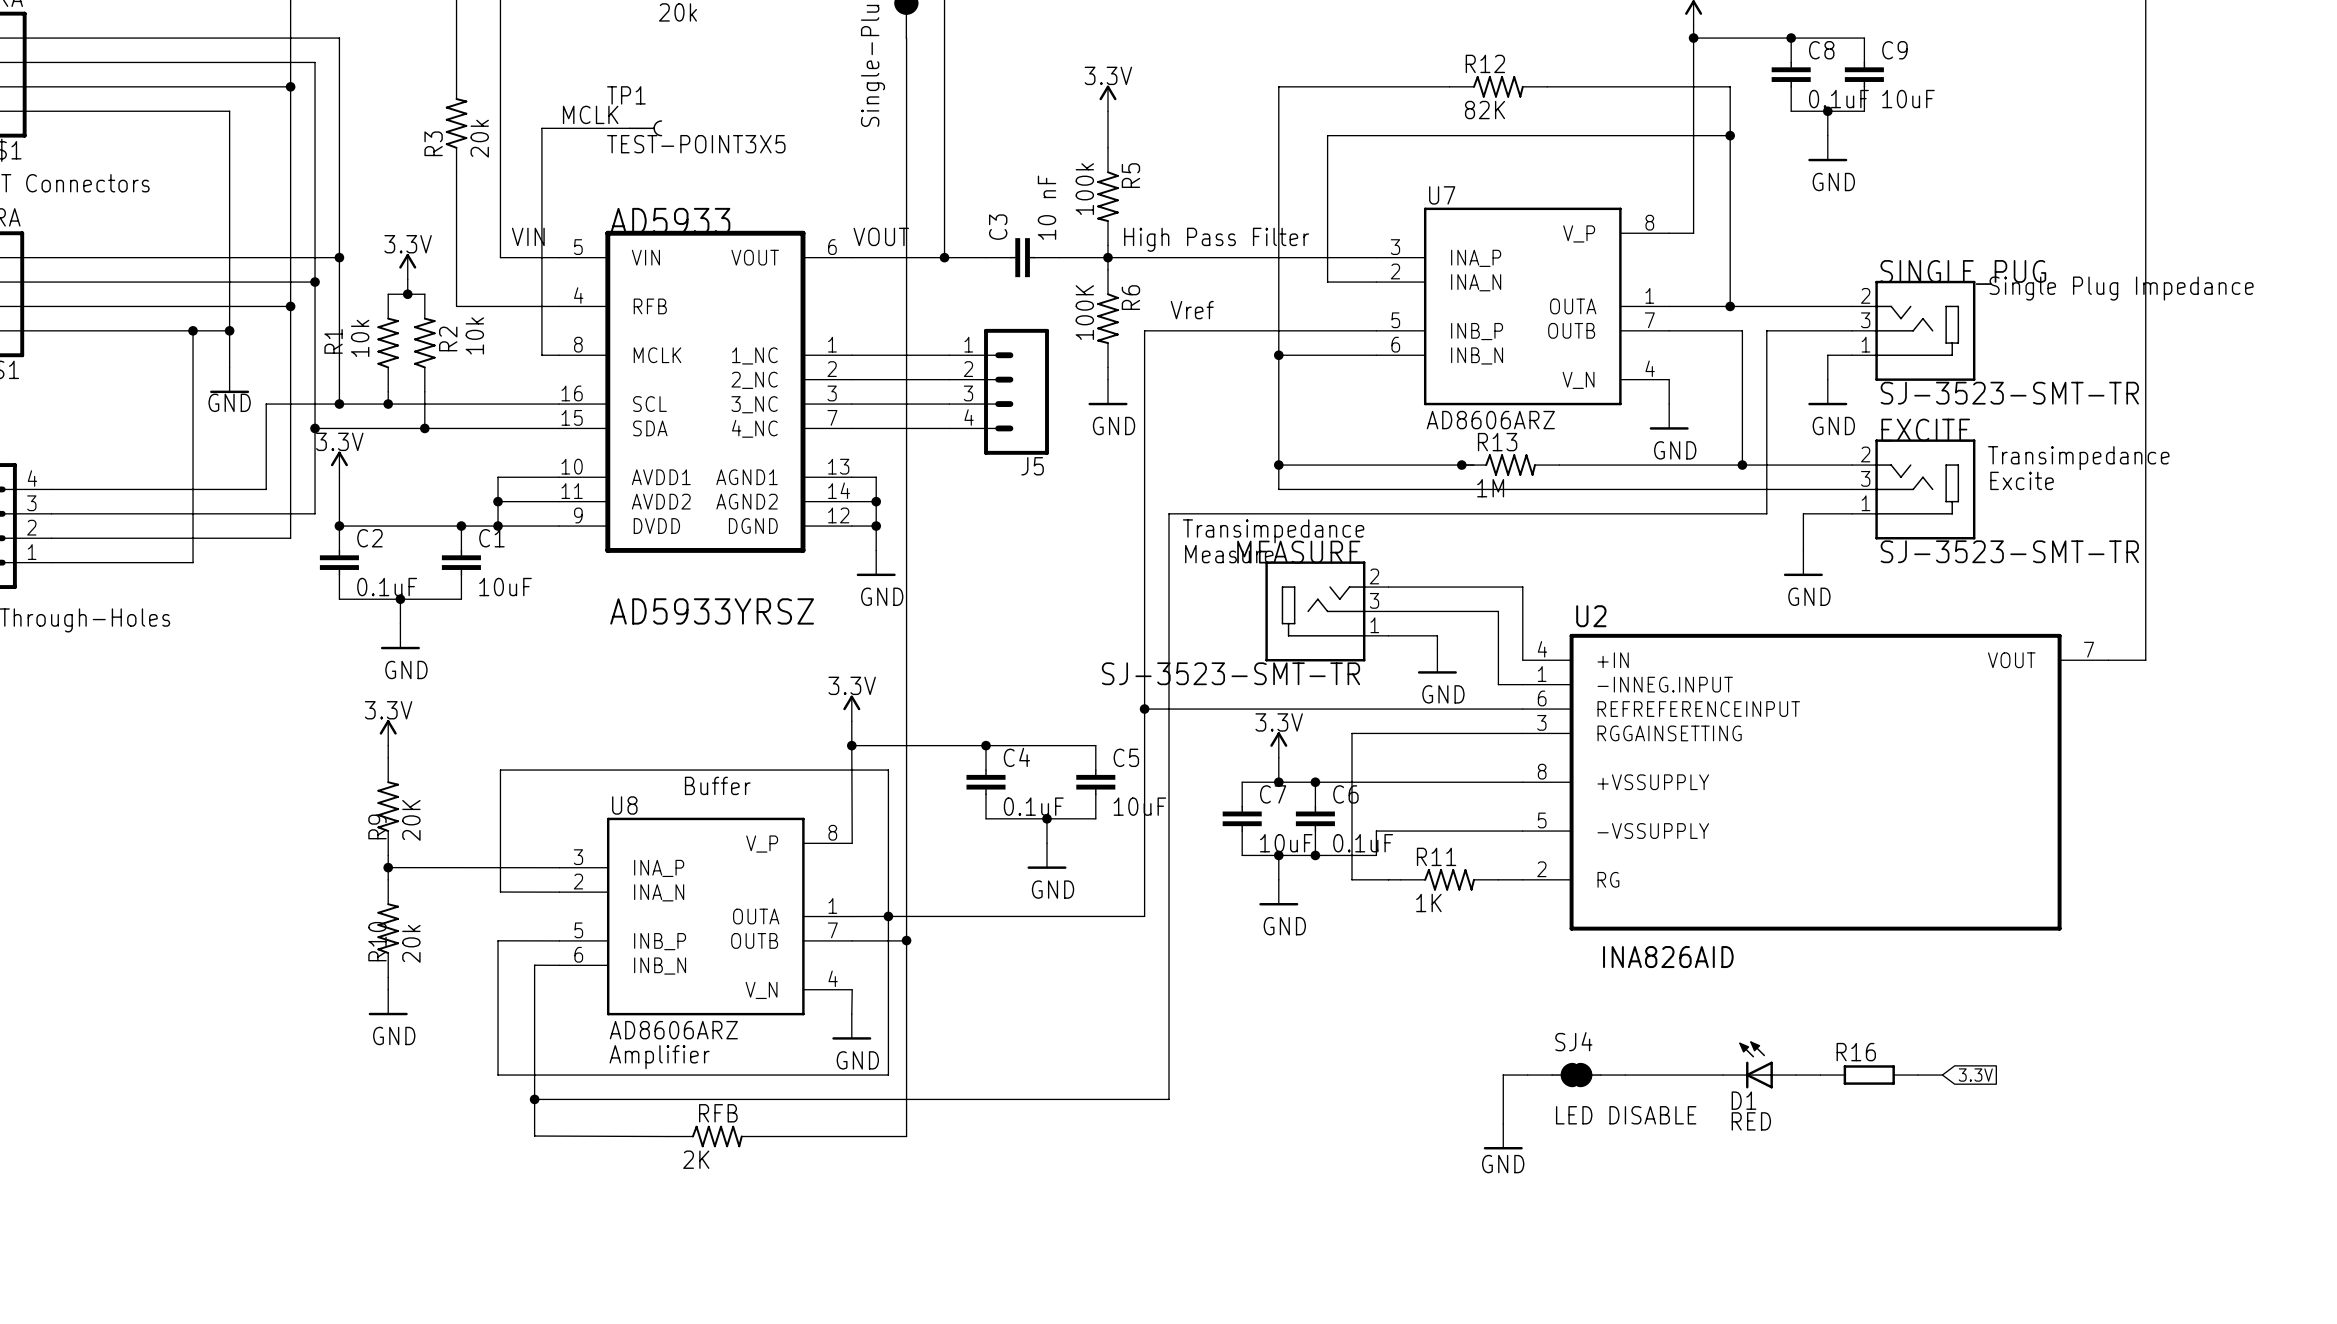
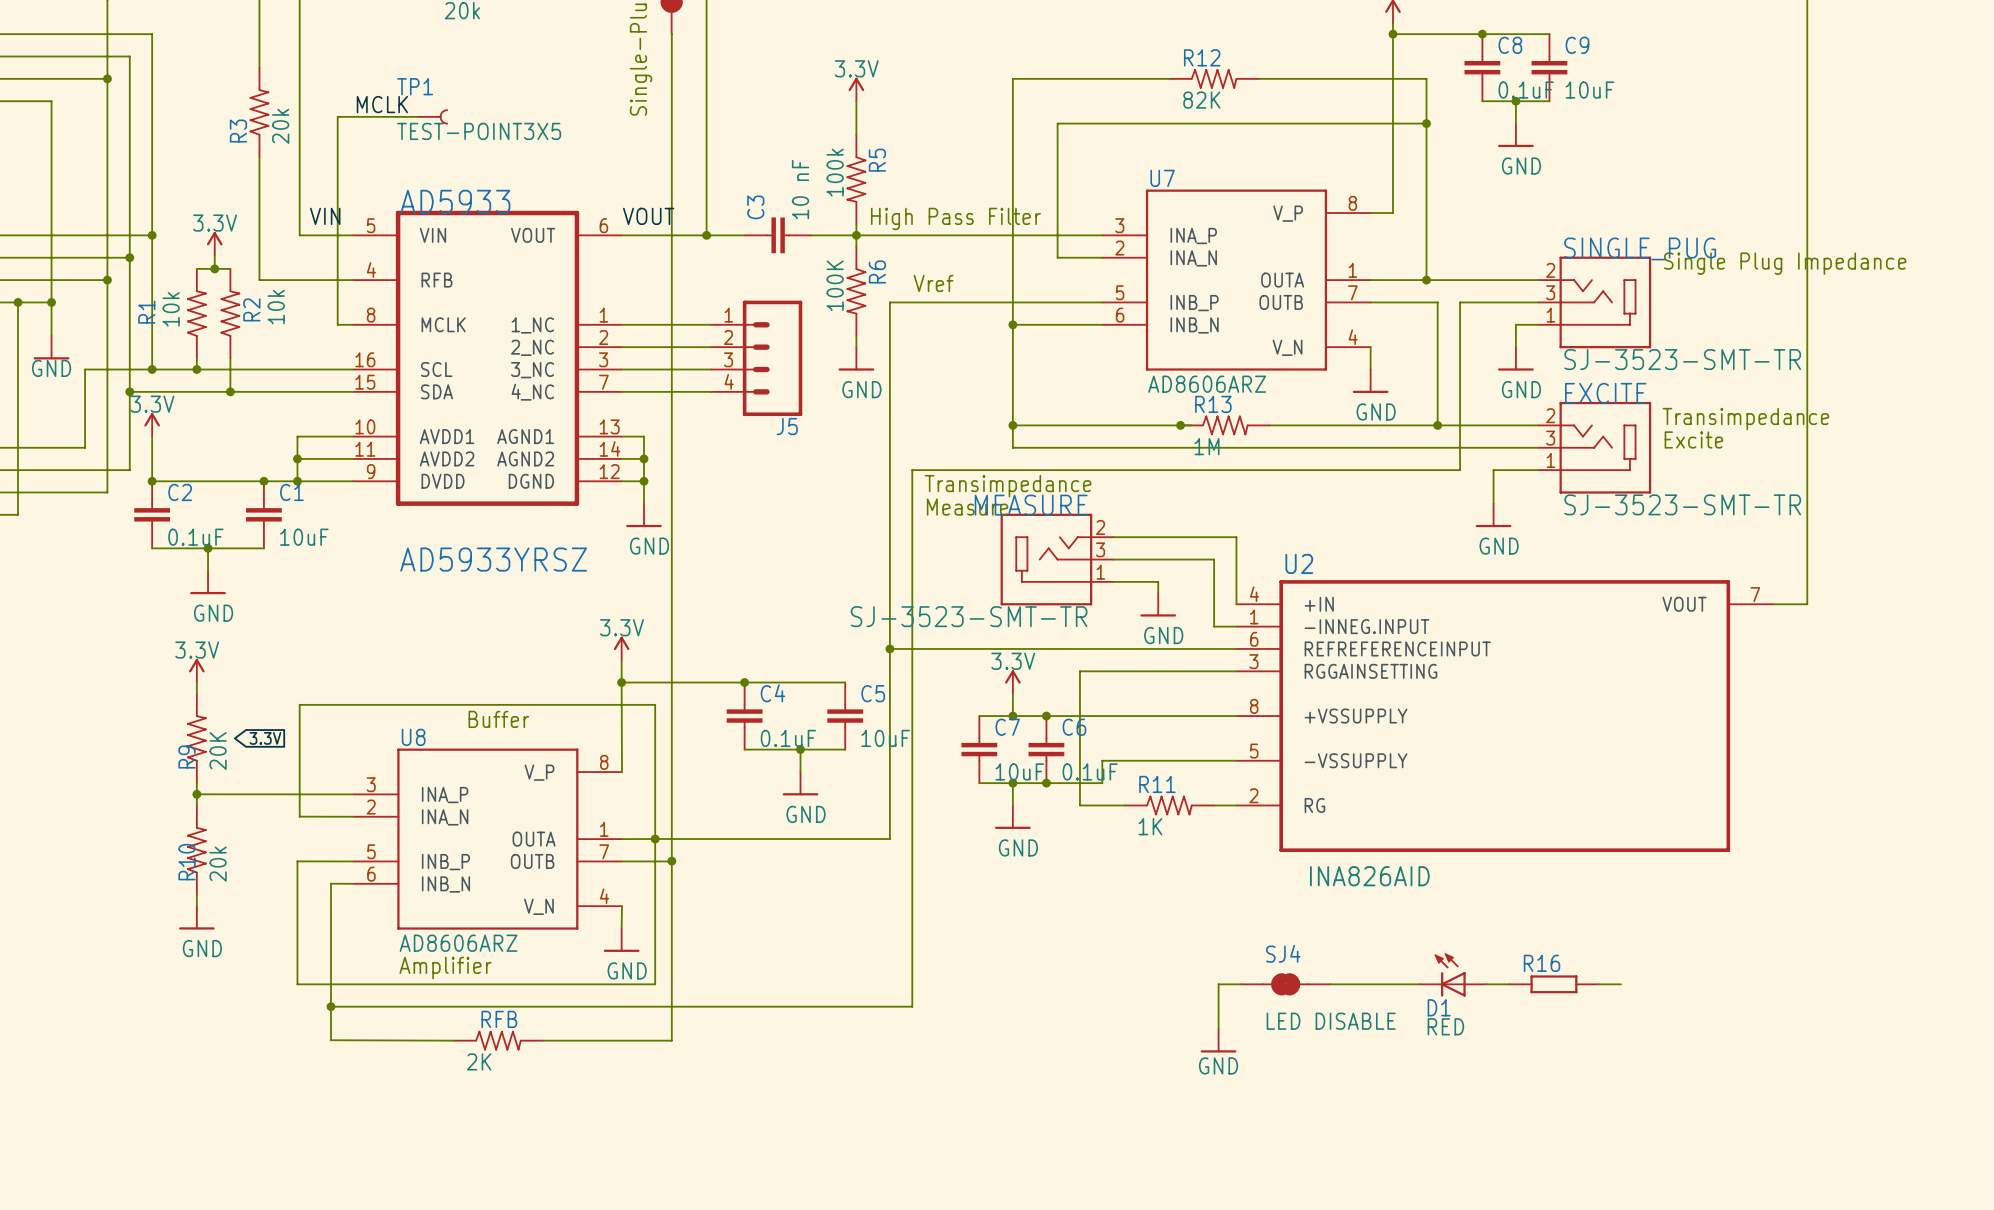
global label: none -> 3.3V (265, 738)
global label: 3.3V (1975, 1075) -> none

